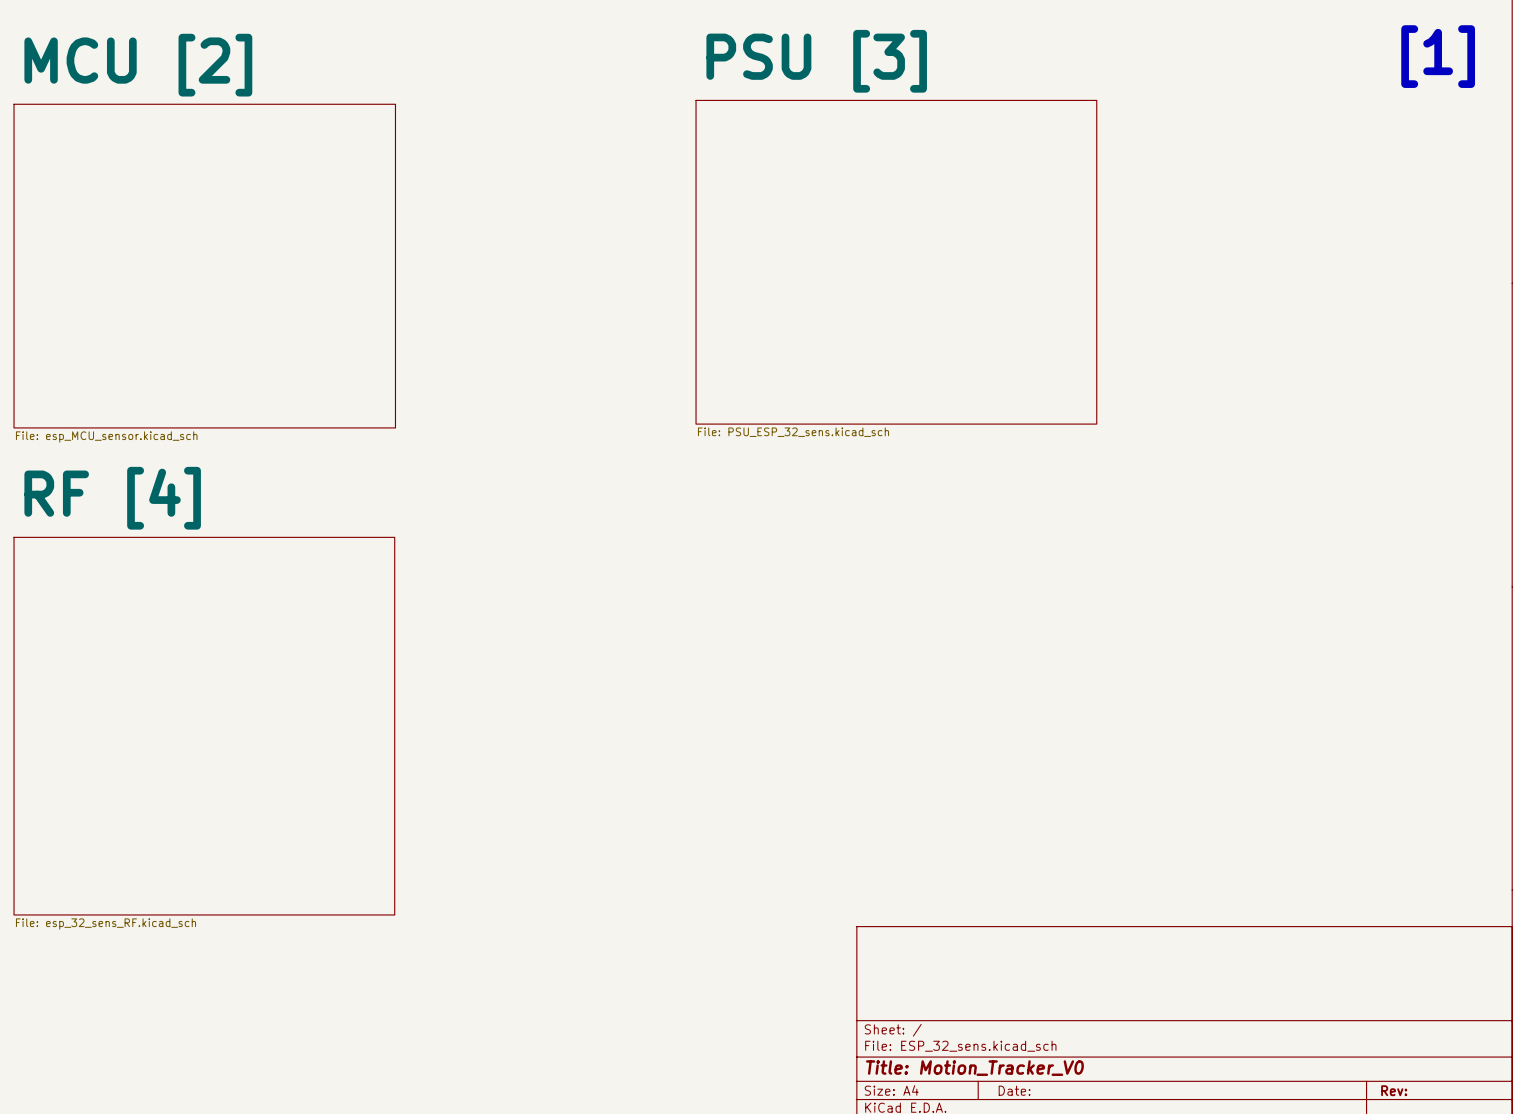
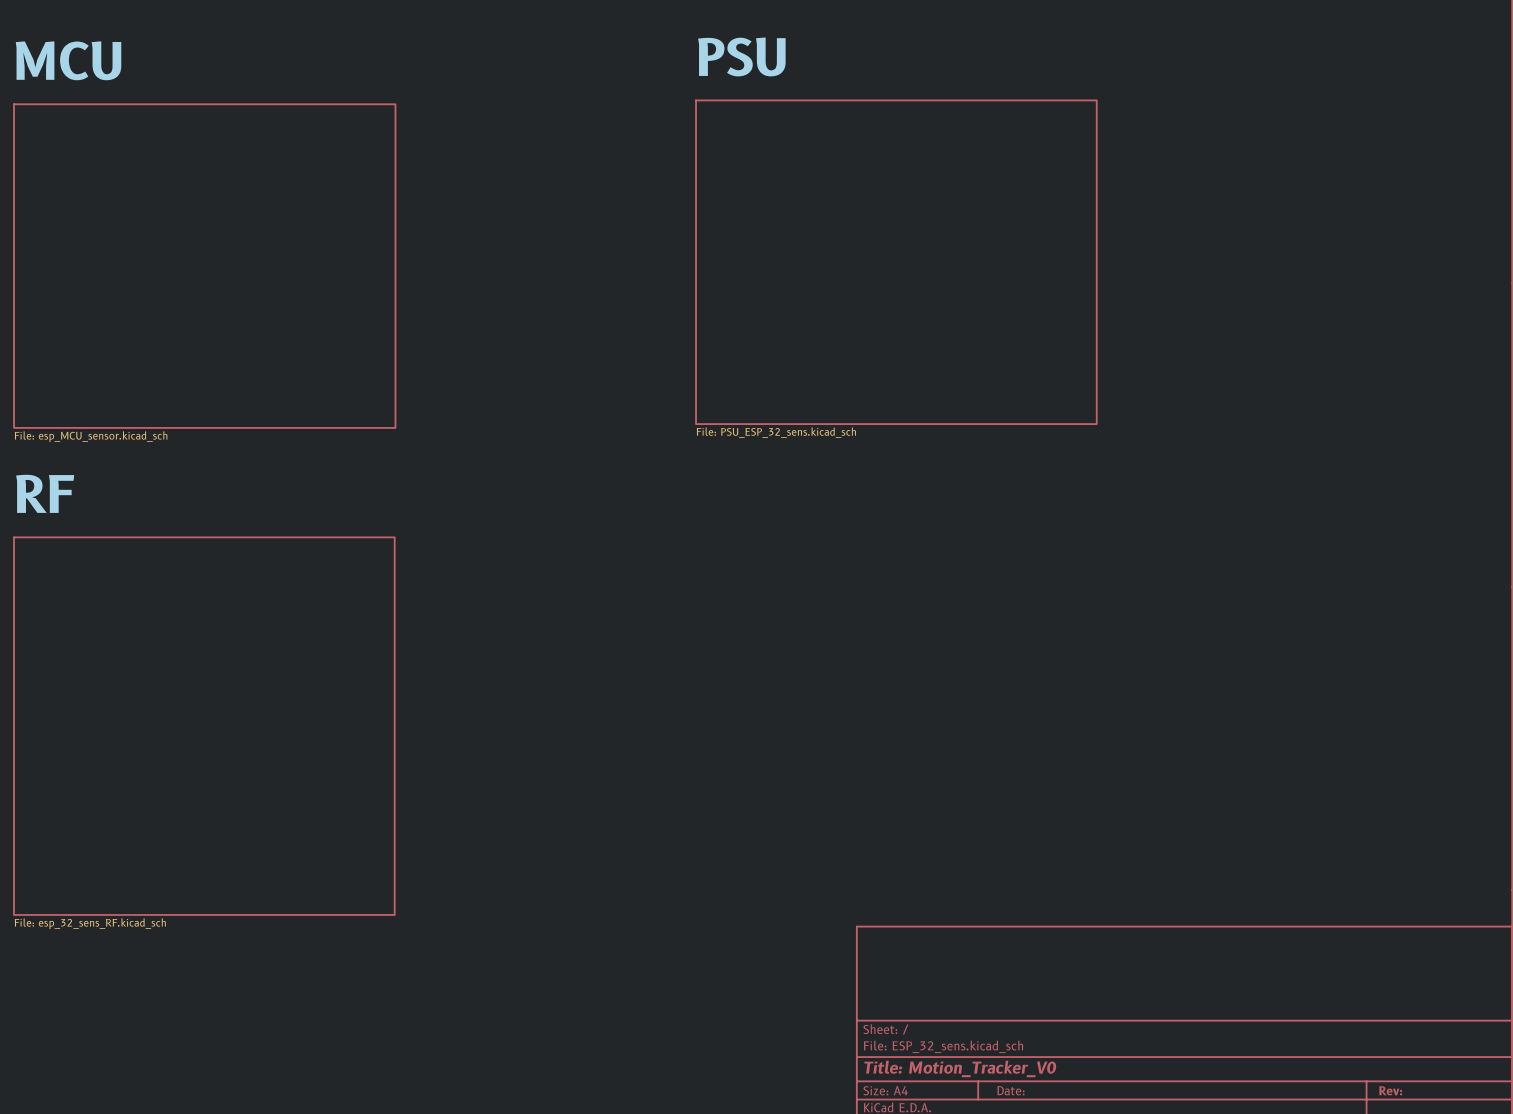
text: [1] (1438, 56) -> none
sheet PSU [3] name: PSU [3] (816, 61) -> PSU (741, 56)
sheet MCU [2] name: MCU [2] (138, 65) -> MCU (68, 60)
sheet RF [4] name: RF [4] (112, 498) -> RF (45, 493)

